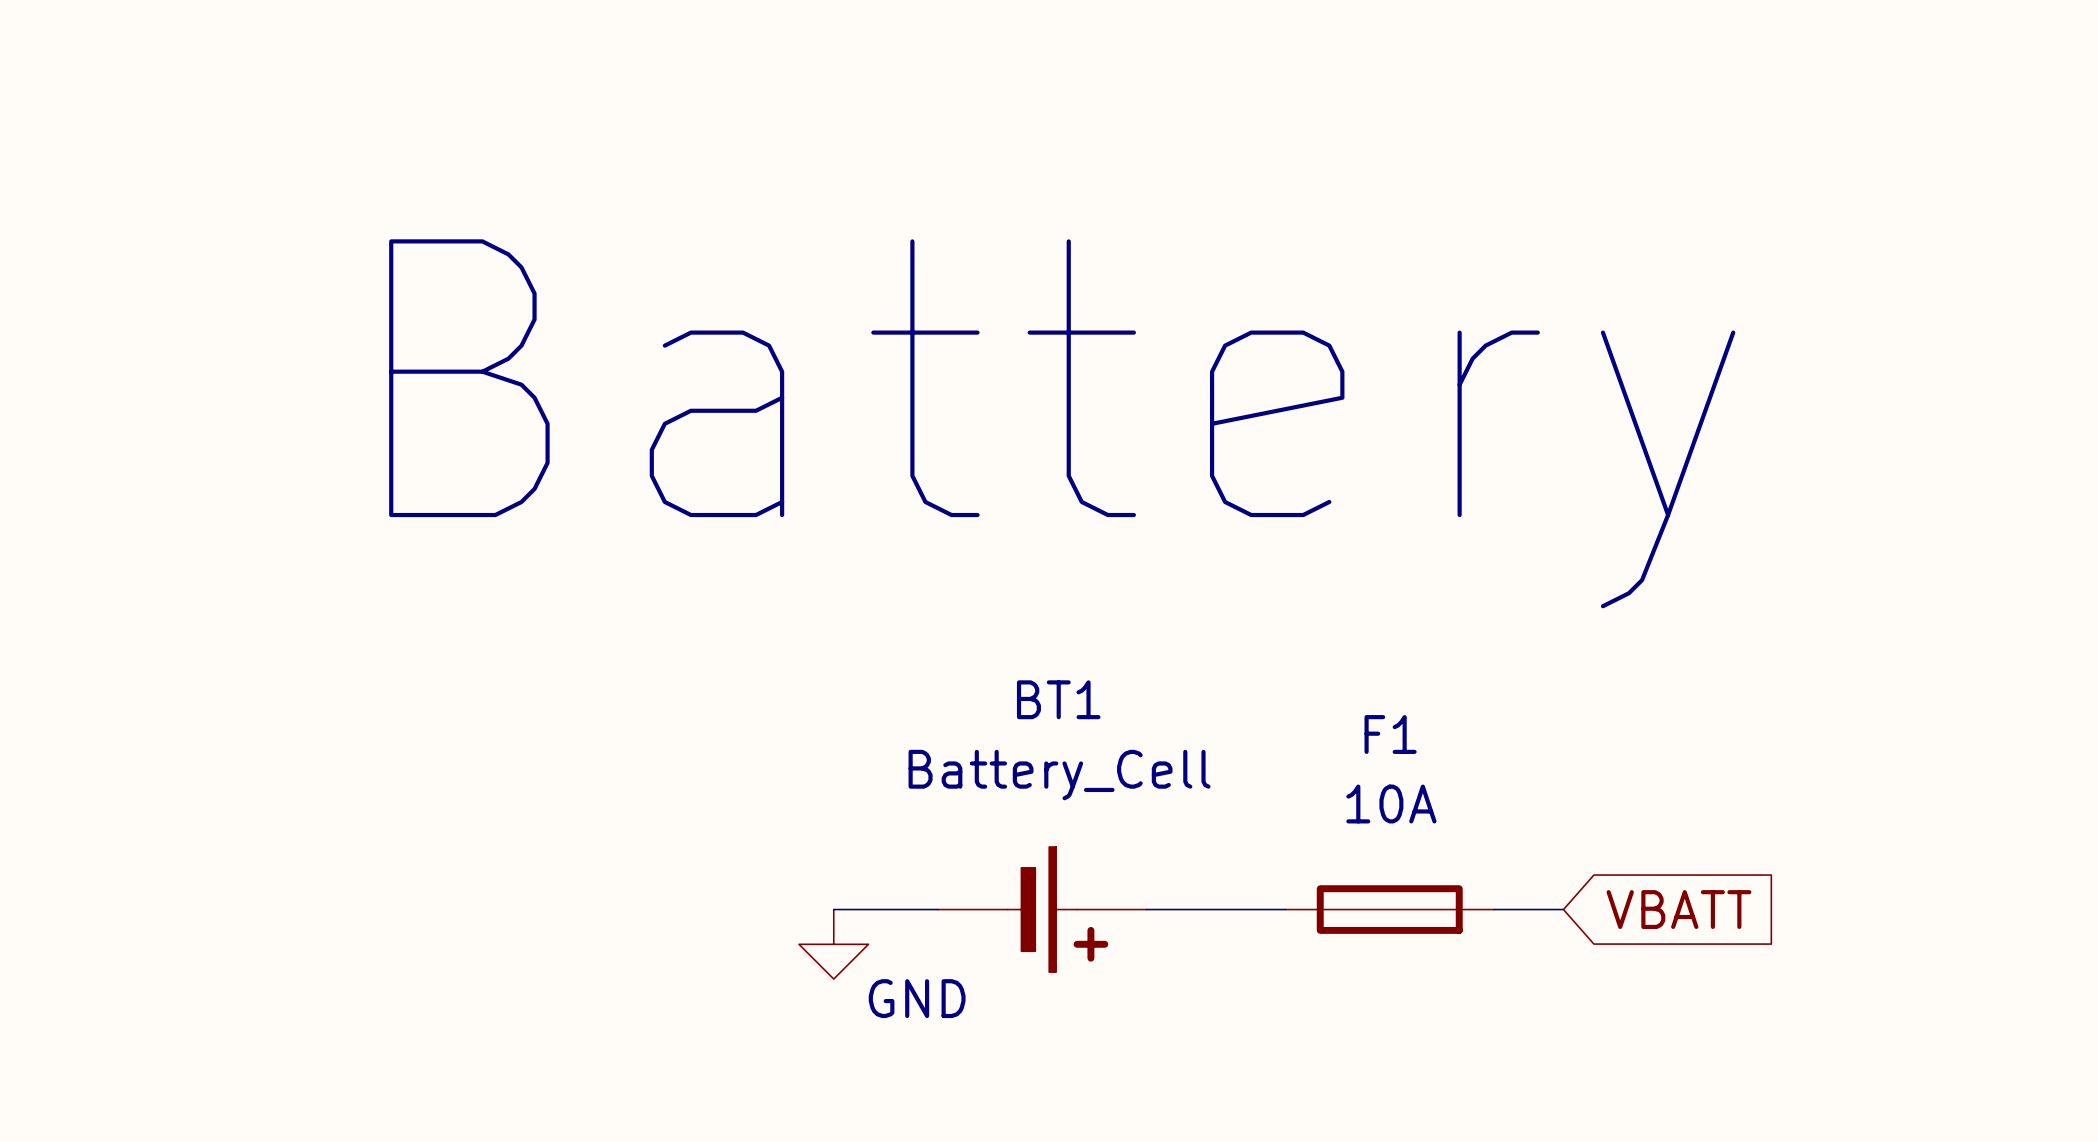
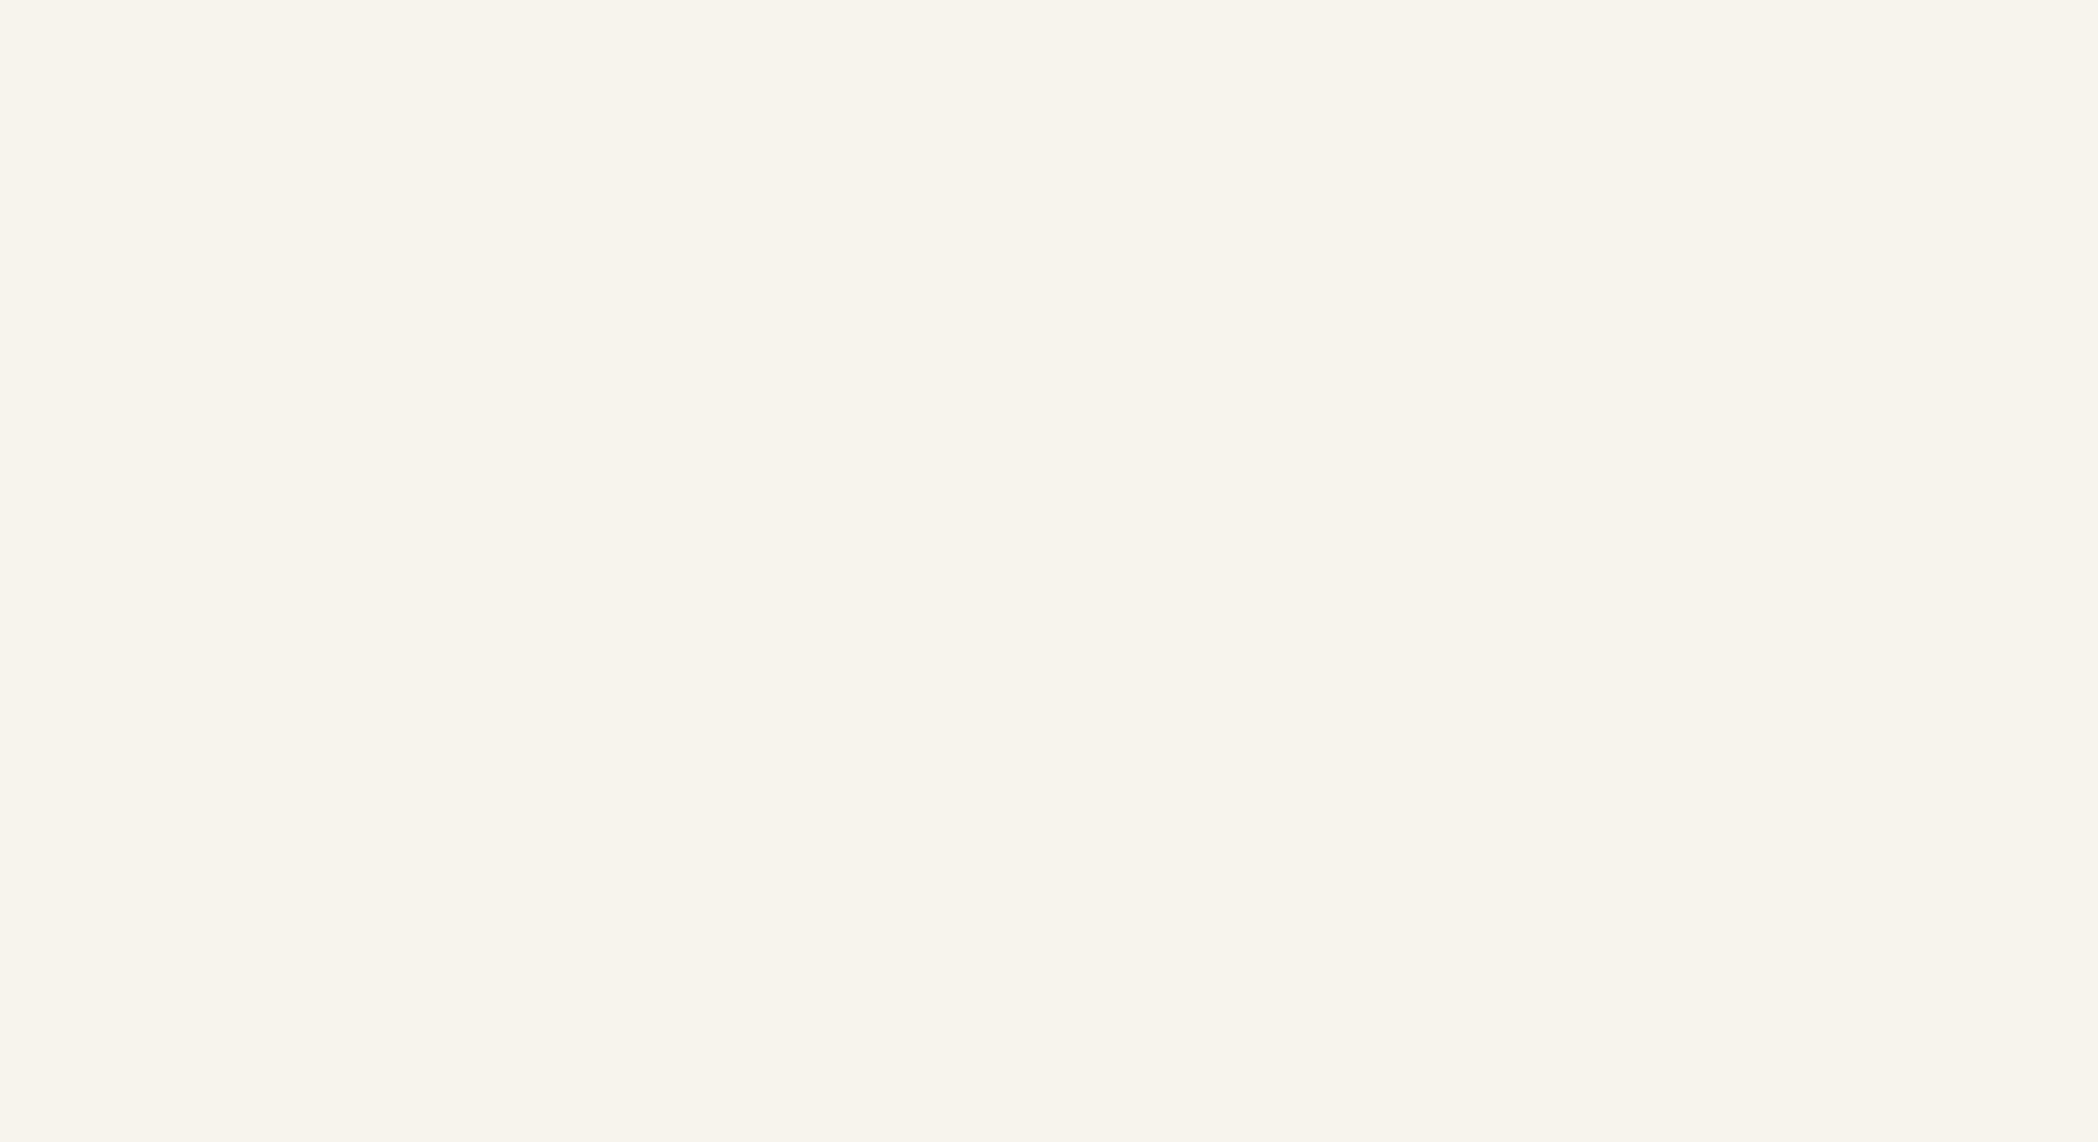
text: Battery (1062, 423) -> none
wire: (833, 909) (938, 909) -> none
BT1: Battery_Cell (1042, 909) -> none
wire: (1146, 909) (1285, 909) -> none
F1: 10A (1389, 909) -> none
wire: (1493, 909) (1563, 909) -> none
global label: VBATT (1678, 909) -> none
power symbol: GND (833, 944) -> none

